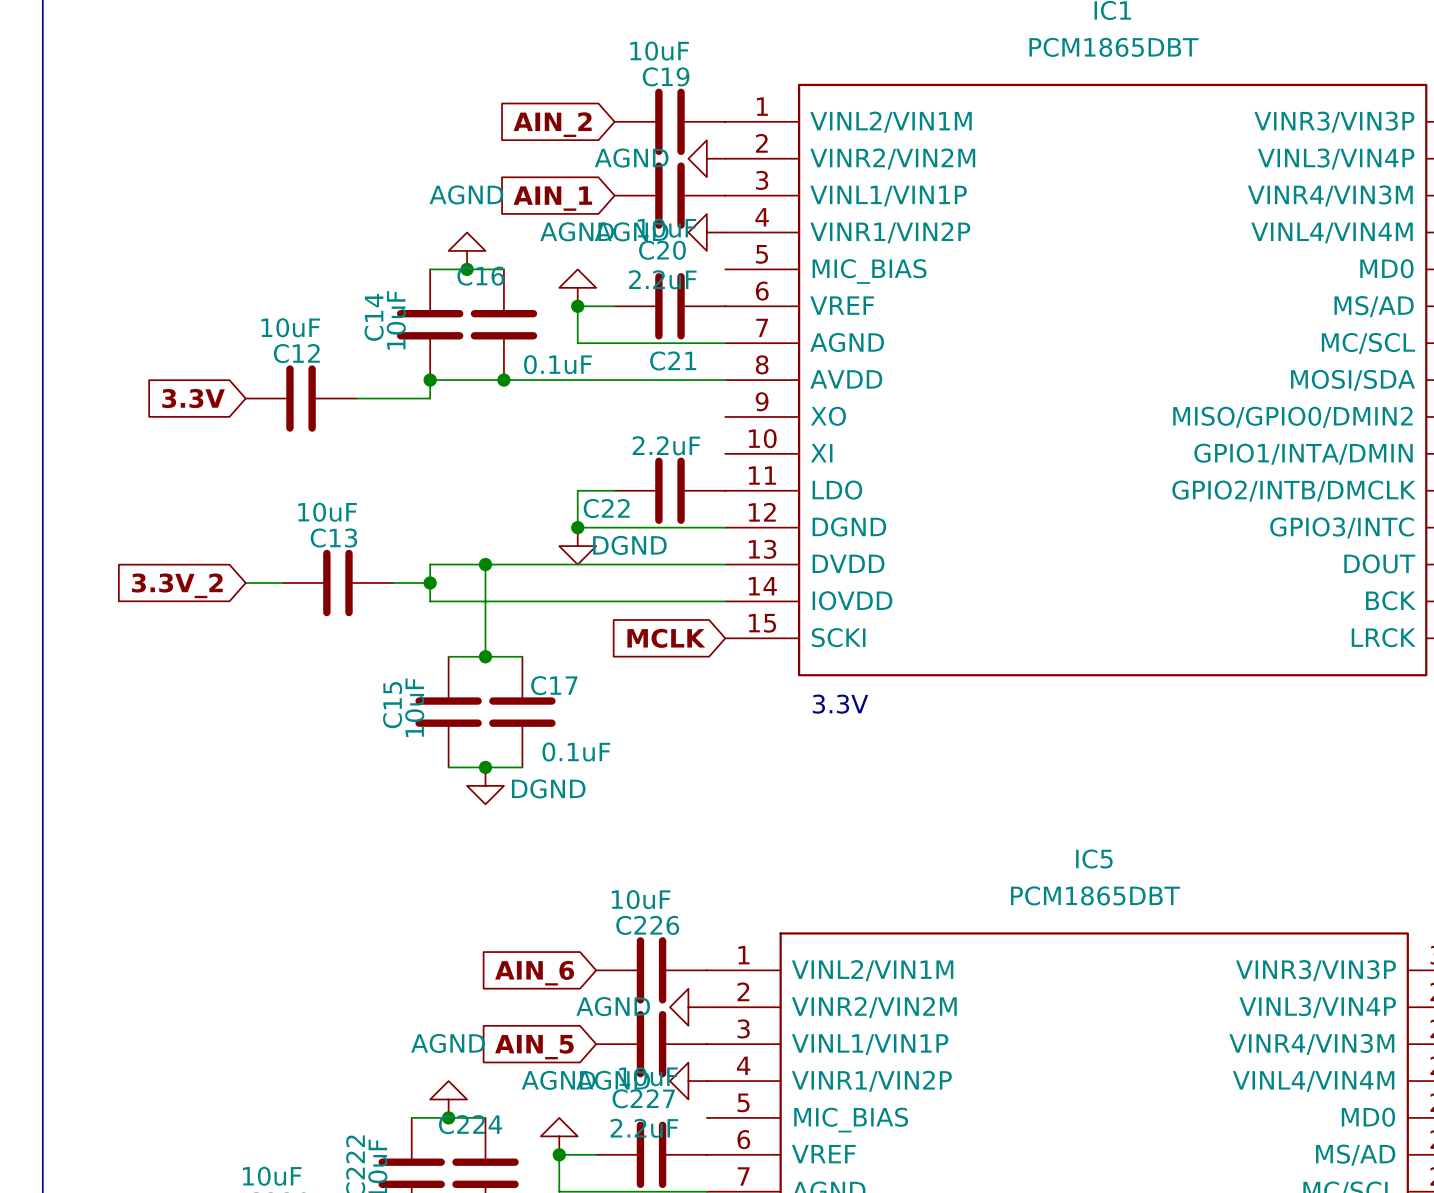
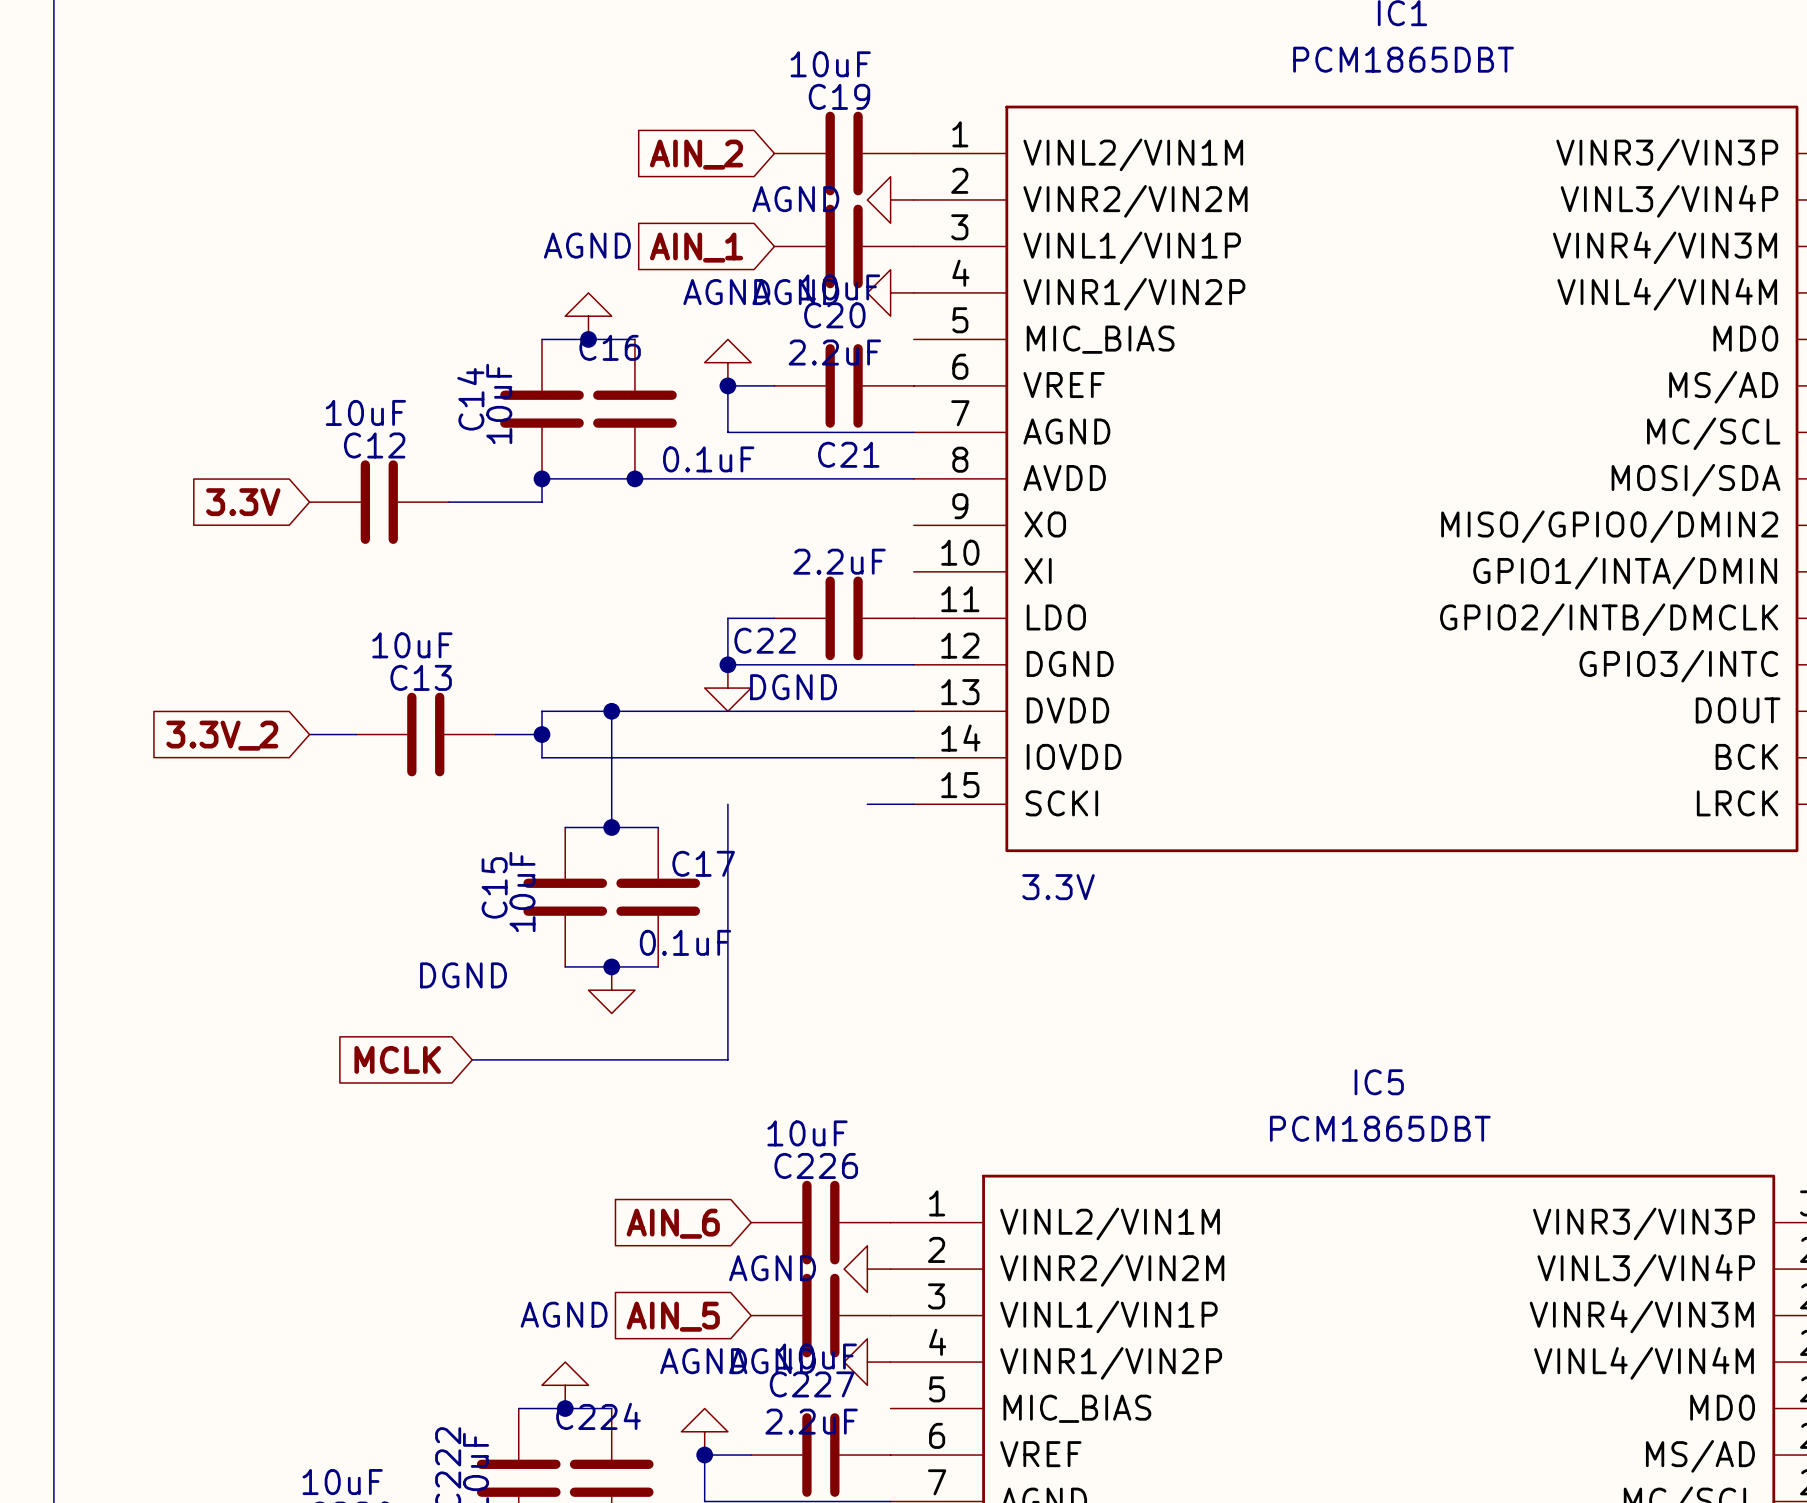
wire: none -> (727, 804) (727, 1059) (472, 1059)
global label: MCLK (666, 638) -> none
wire: none -> (867, 804) (913, 804)
C17 value position: 0.1uF (576, 752) -> 0.1uF (685, 942)
power symbol text position: DGND (548, 788) -> DGND (463, 975)
global label: none -> MCLK (397, 1059)

